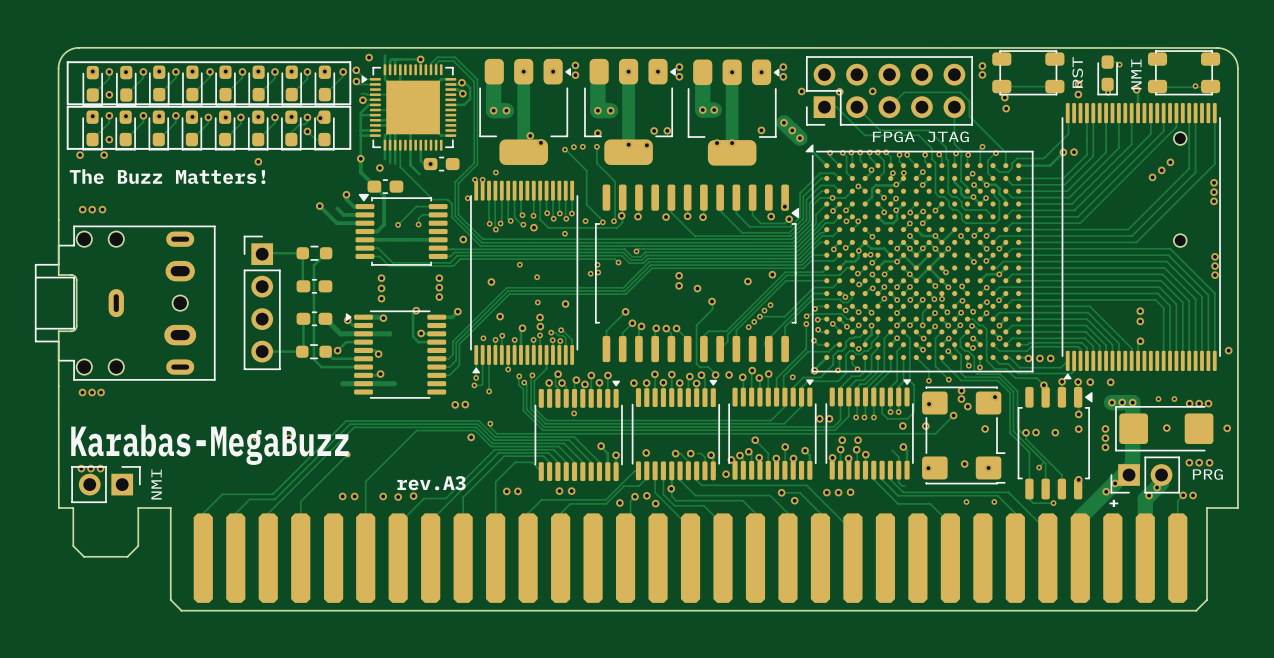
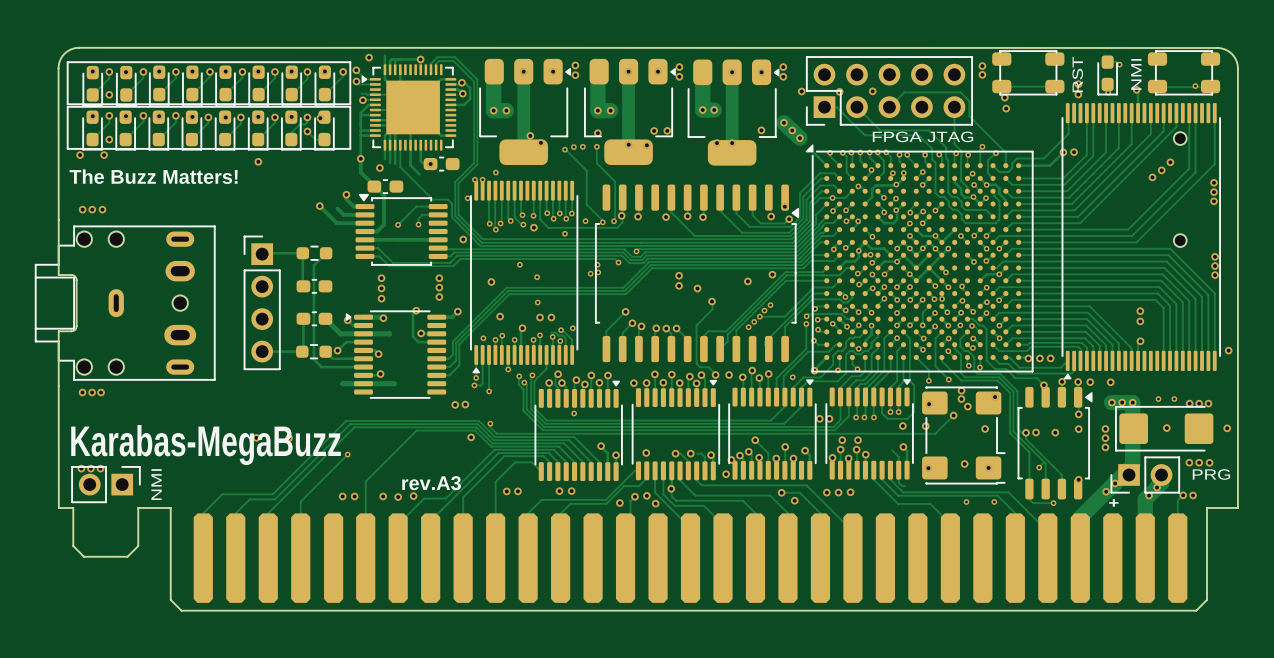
via: (565, 304) -> none
via: none -> (551, 317)
via: (540, 326) -> none
via: none -> (572, 328)
via: (551, 332) -> none
via: none -> (552, 336)
via: (552, 340) -> none

